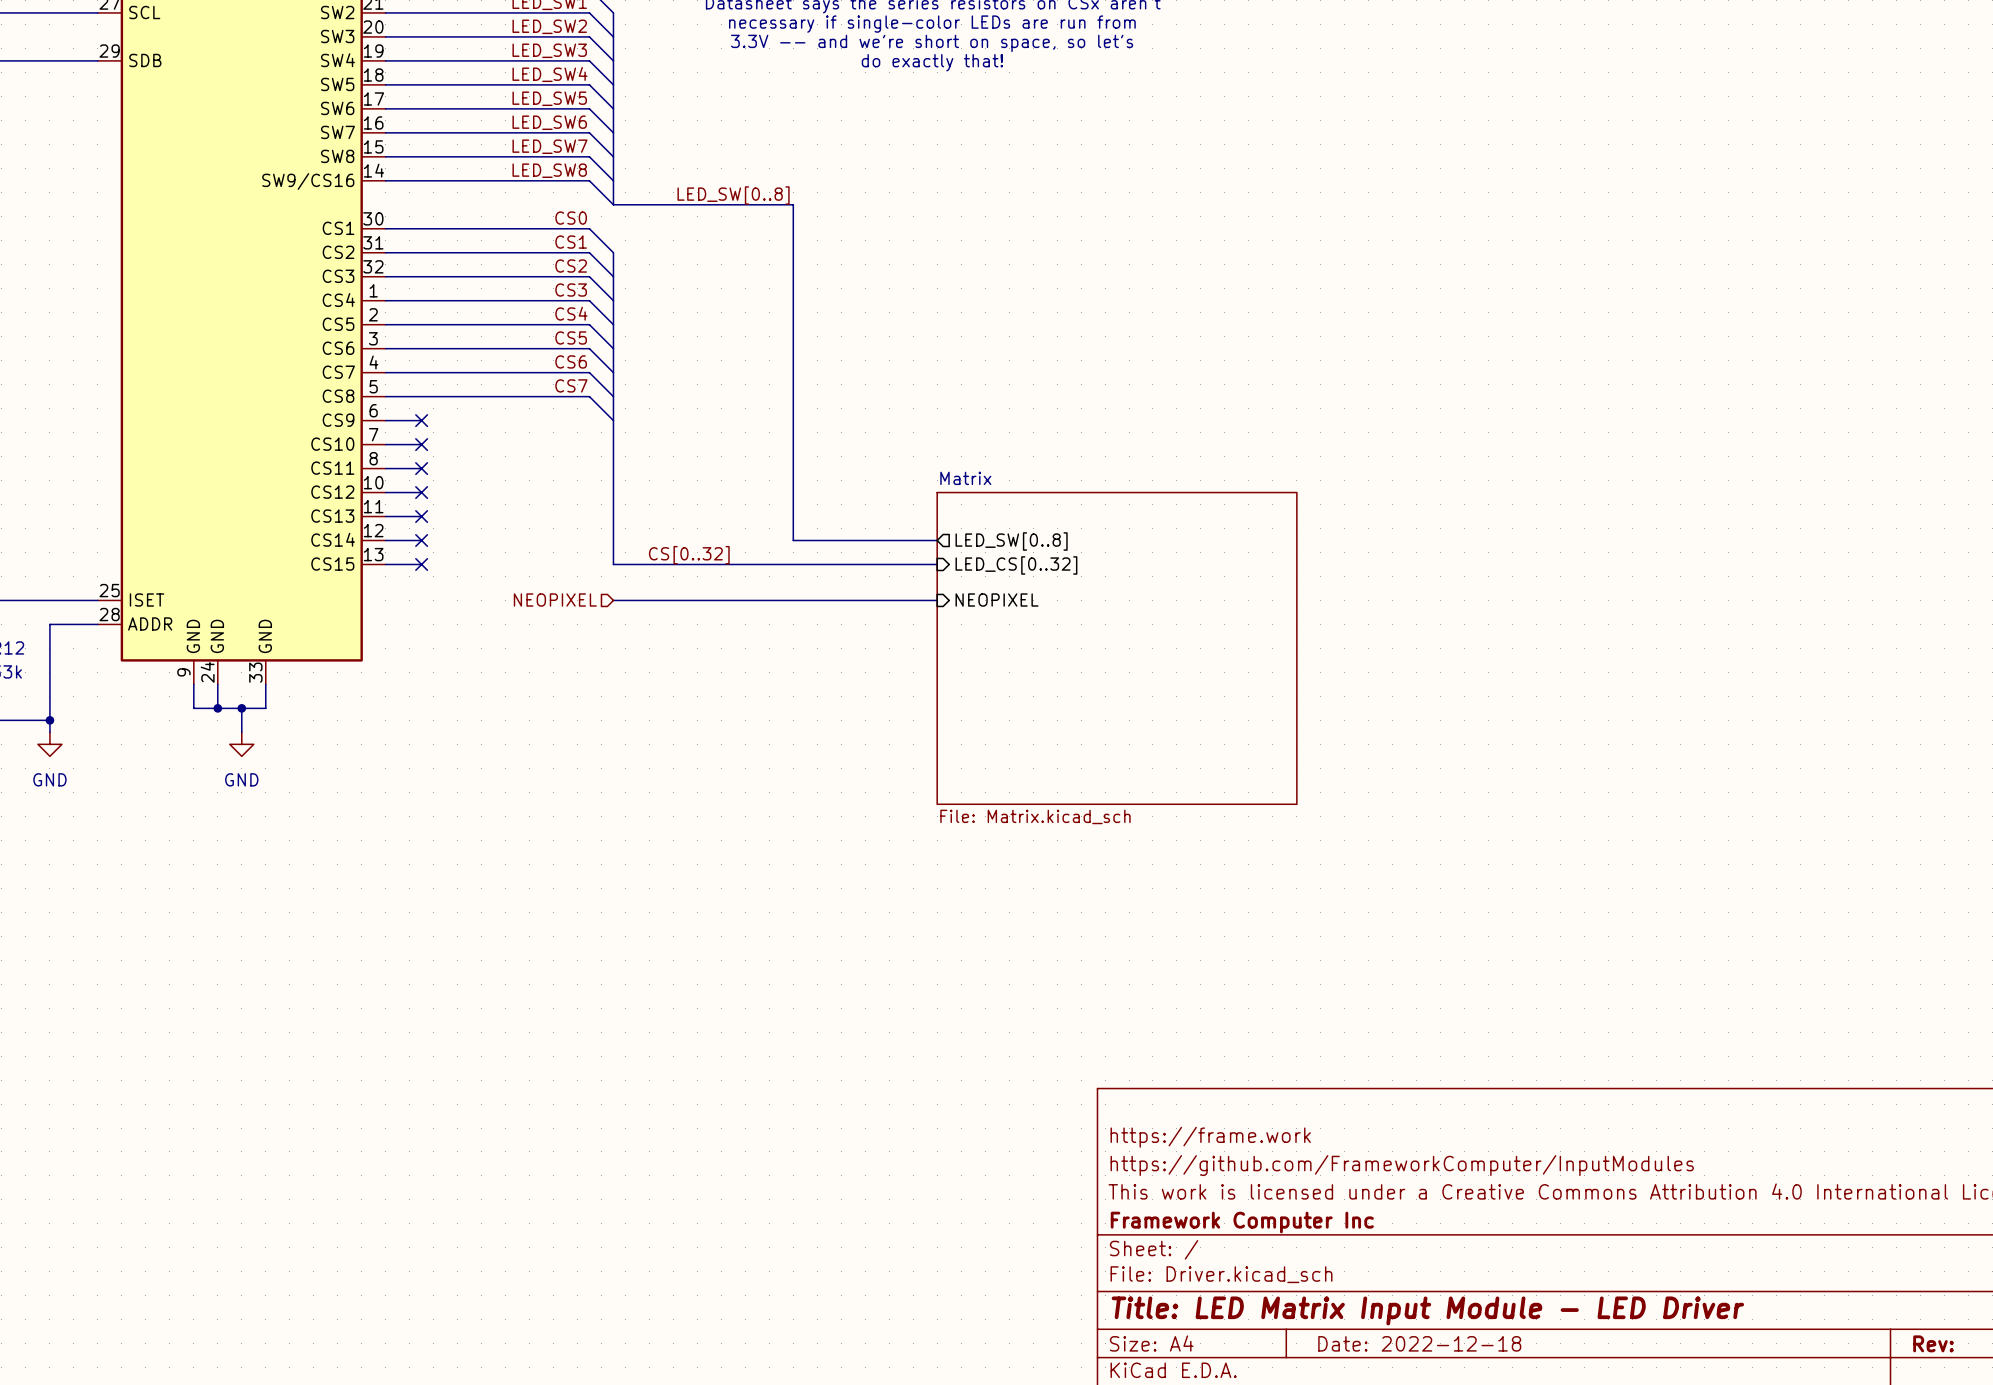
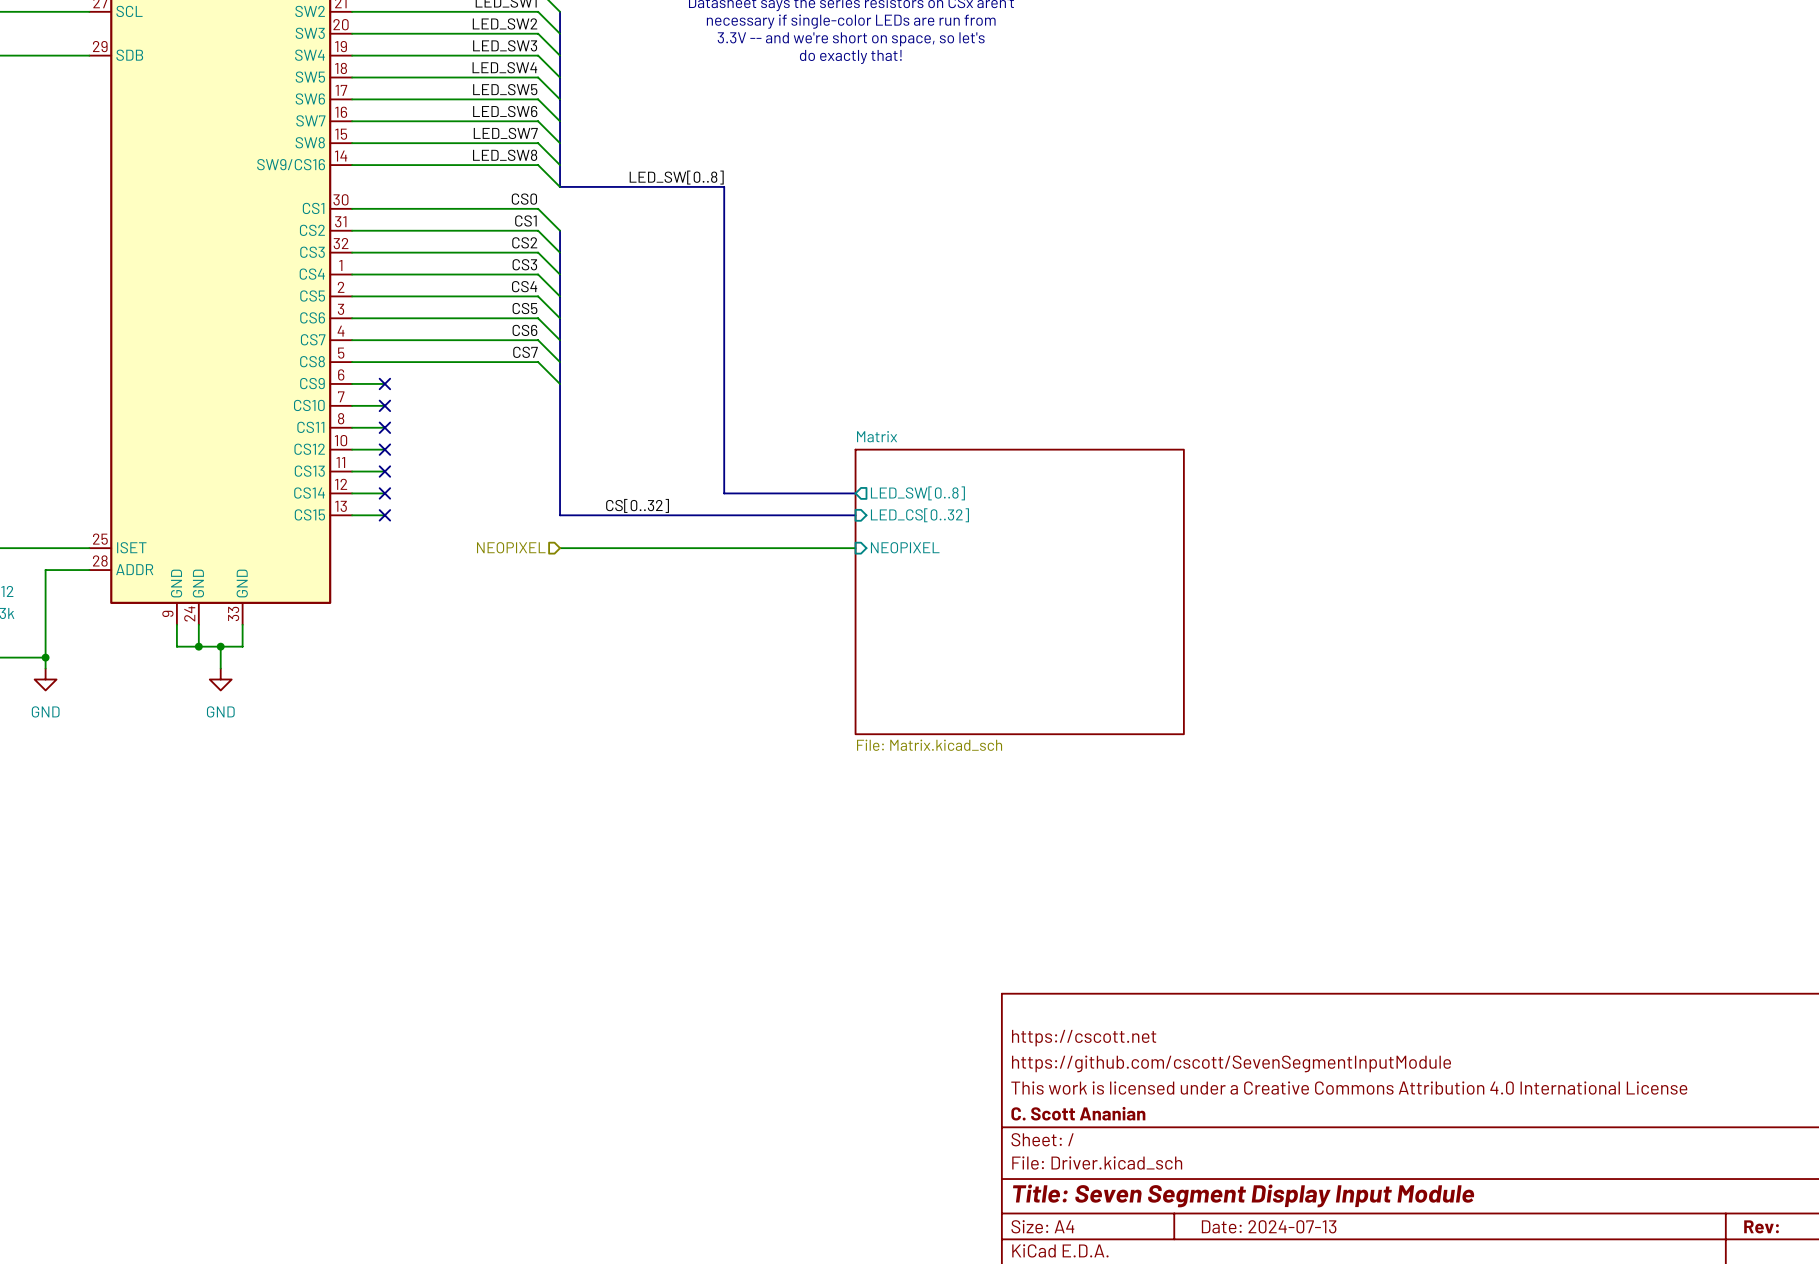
title block: https://frame.work (1210, 1137) -> https://cscott.net (1084, 1038)
title block: https://github.com/FrameworkComputer/InputModules (1402, 1165) -> https://github.com/cscott/SevenSegmentInputModule (1231, 1063)
title block: Framework Computer Inc (1242, 1222) -> C. Scott Ananian (1078, 1113)
title block: Title: LED Matrix Input Module - LED Driver (1427, 1310) -> Title: Seven Segment Display Input Module (1243, 1195)
title block: Date: 2022-12-18 (1419, 1343) -> Date: 2024-07-13 (1269, 1226)

